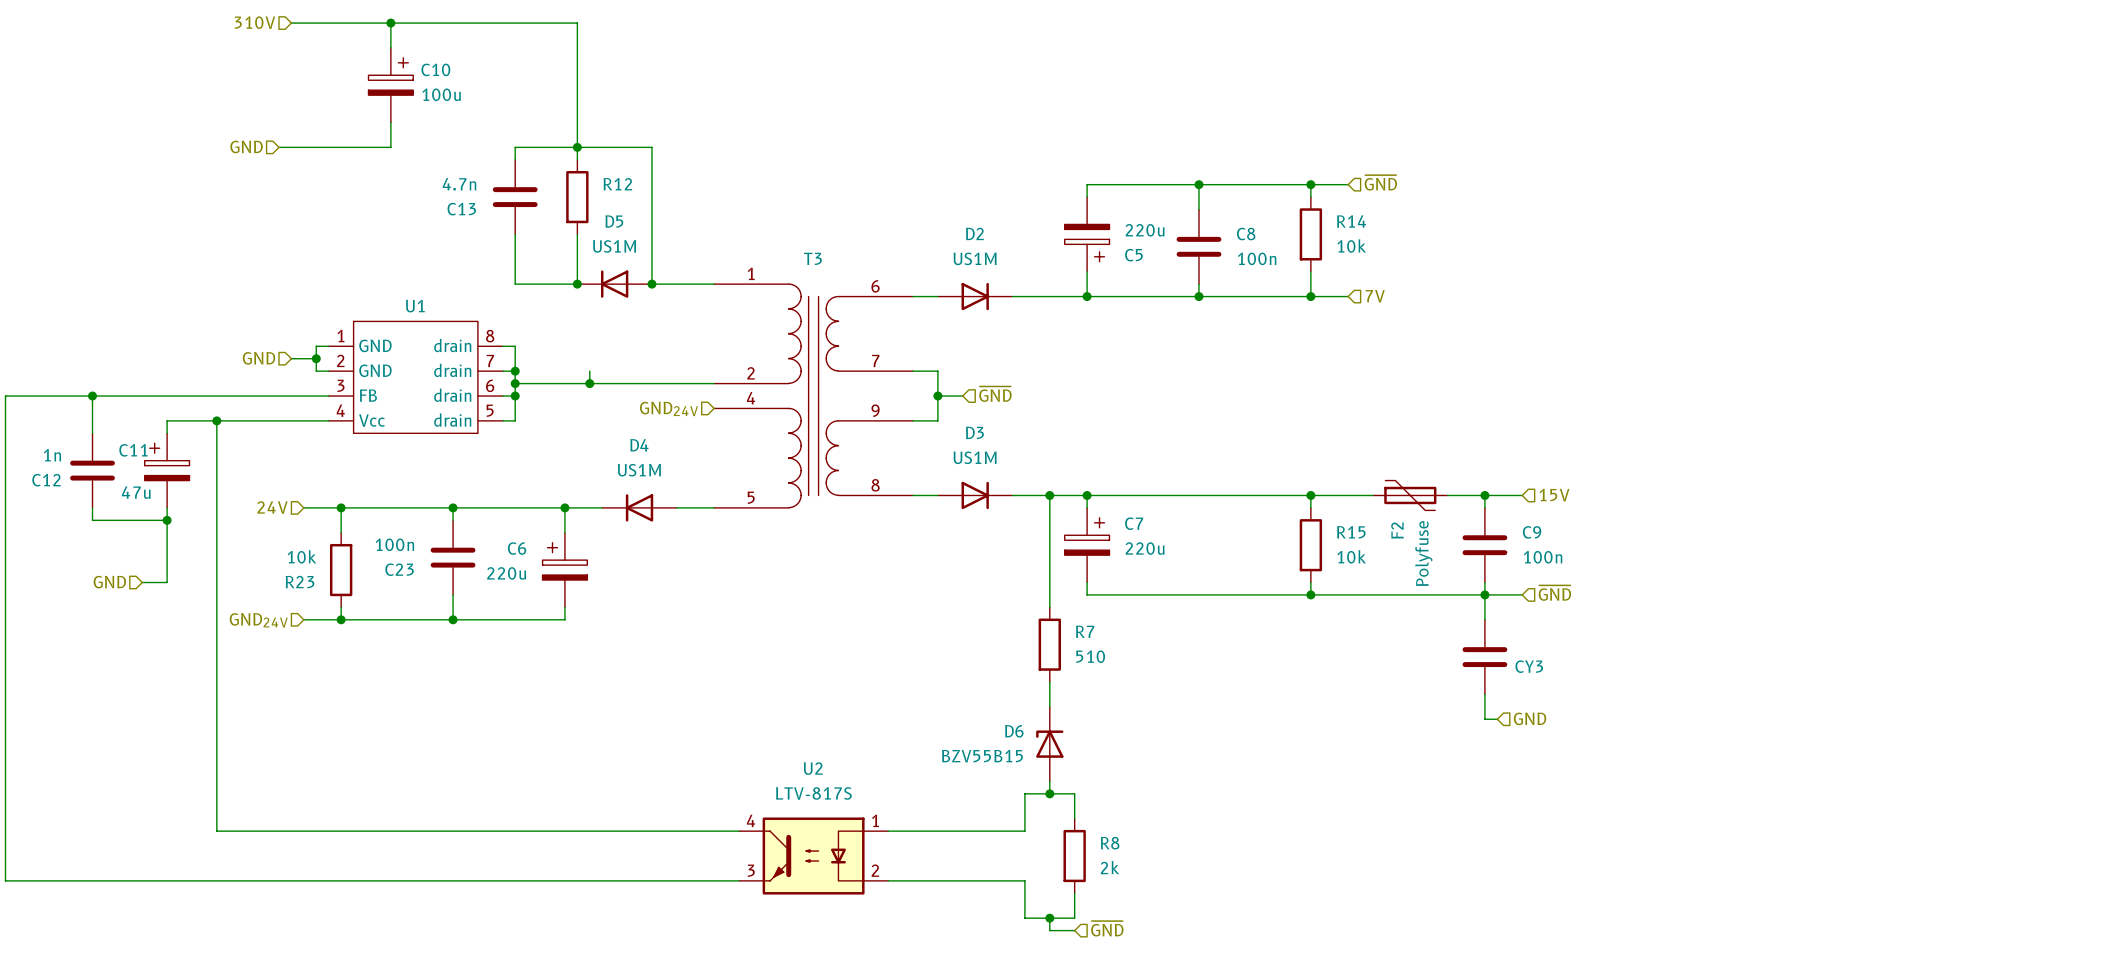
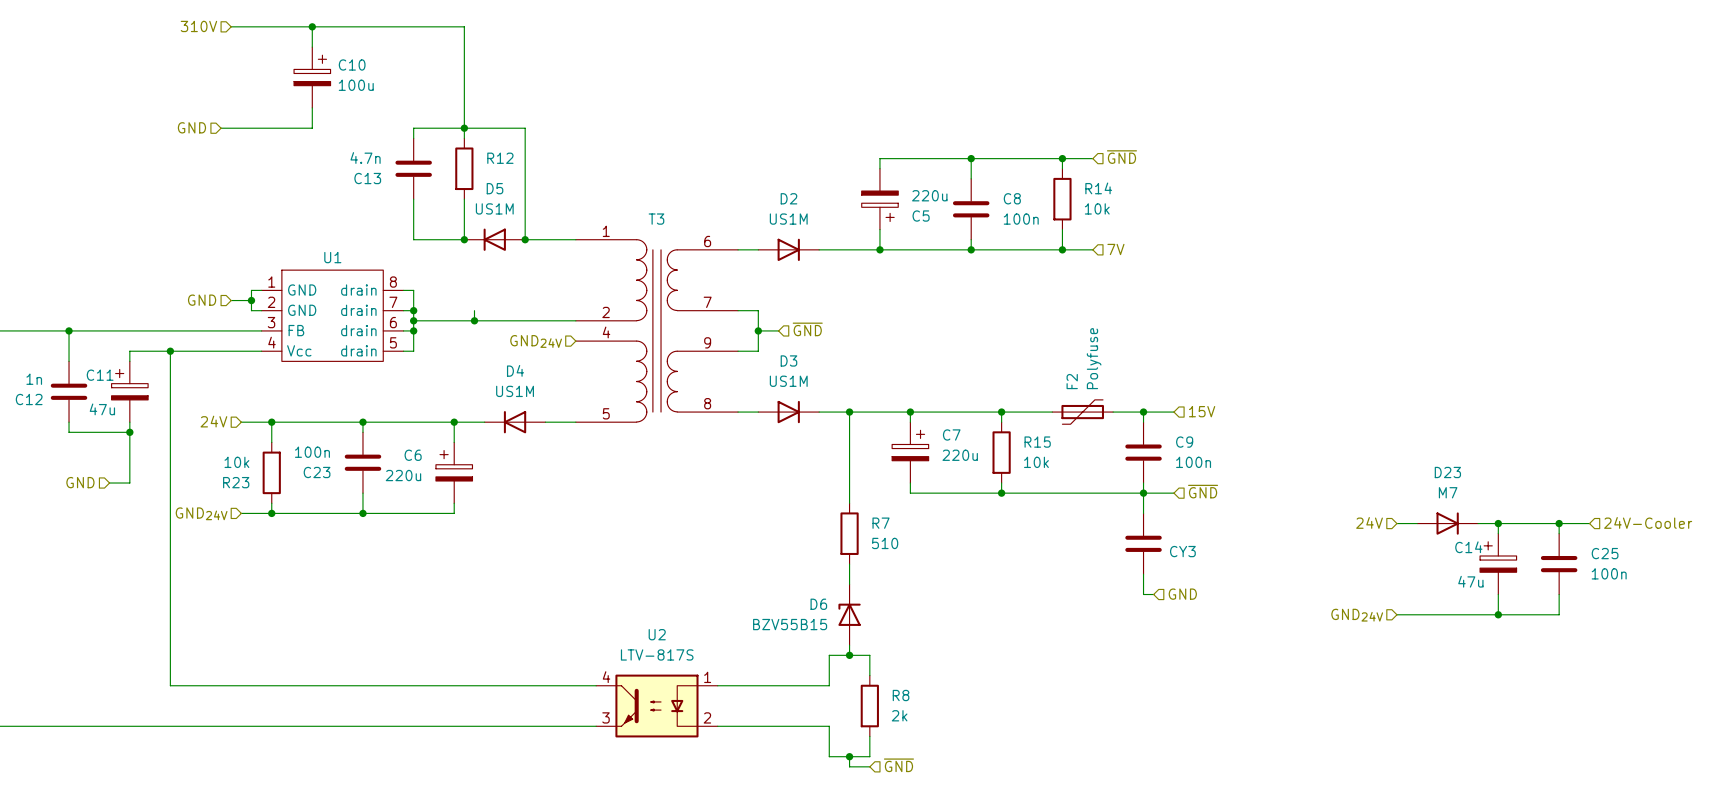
wire: (1087, 495) (1087, 507) -> (910, 412) (910, 422)
junction position: (1087, 495) -> (910, 412)
junction: none -> (1001, 412)
junction: (1310, 495) -> none
junction: none -> (1143, 412)
F2 flip: as is (1410, 495) -> left-right (1082, 412)
F2 position: (1410, 495) -> (1082, 412)
wire: (1447, 495) (1522, 495) -> none
wire: (1484, 495) (1484, 507) -> (1143, 412) (1143, 422)
junction: (1484, 495) -> none
hierarchical label position: 15V (1554, 495) -> 15V (1202, 411)
F2 name position: F2 (1397, 530) -> F2 (1072, 381)
C7 position: (1087, 545) -> (910, 452)
R15 position: (1310, 545) -> (1001, 452)
C9 position: (1484, 545) -> (1143, 452)
F2 value position: Polyfuse (1423, 553) -> Polyfuse (1094, 358)
wire: (1087, 582) (1087, 594) (1124, 594) -> (910, 483) (910, 493)
wire: (1310, 582) (1310, 594) -> (1001, 483) (1001, 493)
wire: (1484, 582) (1484, 619) -> (1143, 483) (1143, 513)
hierarchical label position: ~{GND} (1554, 593) -> ~{GND} (1203, 491)
junction: none -> (1001, 493)
junction: (1310, 594) -> none
junction: none -> (1143, 493)
wire: (1447, 594) (1522, 594) -> none
junction: (1484, 594) -> none
hierarchical label: none -> 24V (1369, 522)
hierarchical label: none -> 24V-Cooler (1648, 522)
wire: none -> (1396, 523) (1417, 523)
D23: none -> M7 (1447, 523)
wire: none -> (1478, 523) (1589, 523)
wire: none -> (1498, 523) (1498, 533)
junction: none -> (1498, 523)
wire: none -> (1559, 523) (1559, 533)
junction: none -> (1559, 523)
CY3 position: (1484, 657) -> (1143, 543)
C14: none -> 47u (1498, 564)
C25: none -> 100n (1559, 564)
wire: (1484, 694) (1484, 719) (1497, 719) -> (1143, 574) (1143, 594) (1153, 594)
hierarchical label position: GND (1530, 718) -> GND (1182, 594)
wire: none -> (1498, 594) (1498, 614)
wire: none -> (1559, 594) (1559, 614) (1396, 614)
hierarchical label: none -> GND24V (1357, 615)
junction: none -> (1498, 614)

